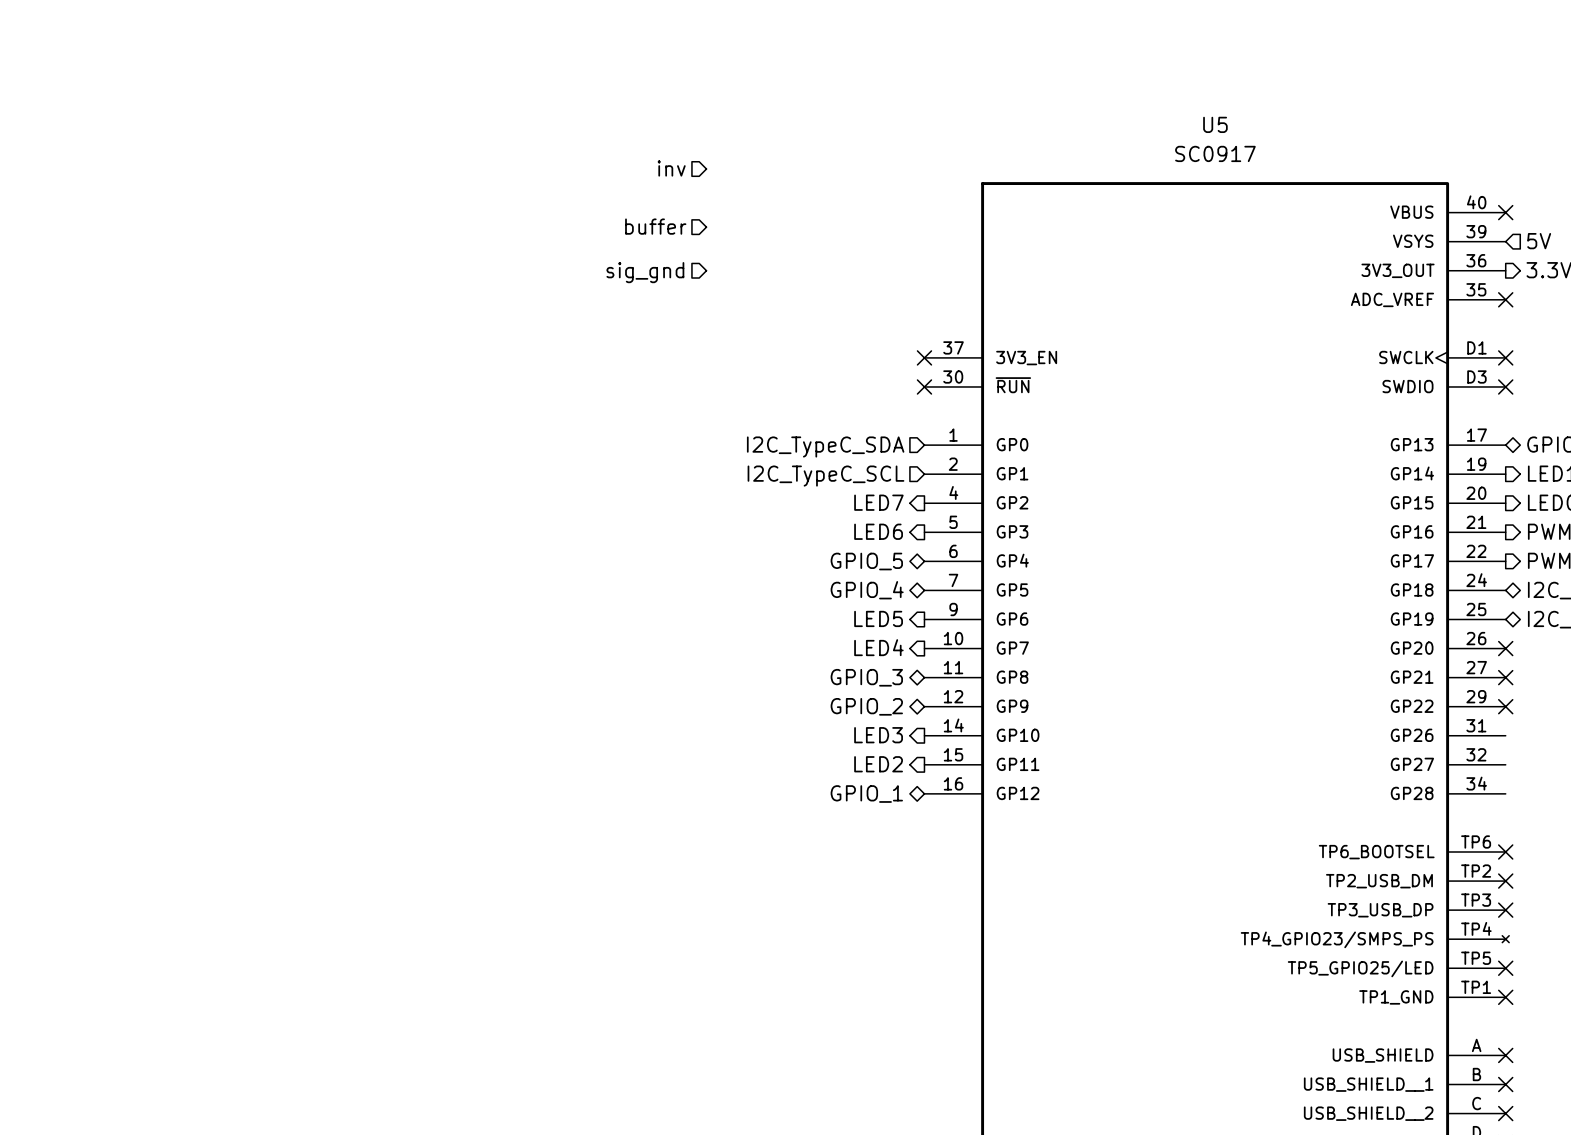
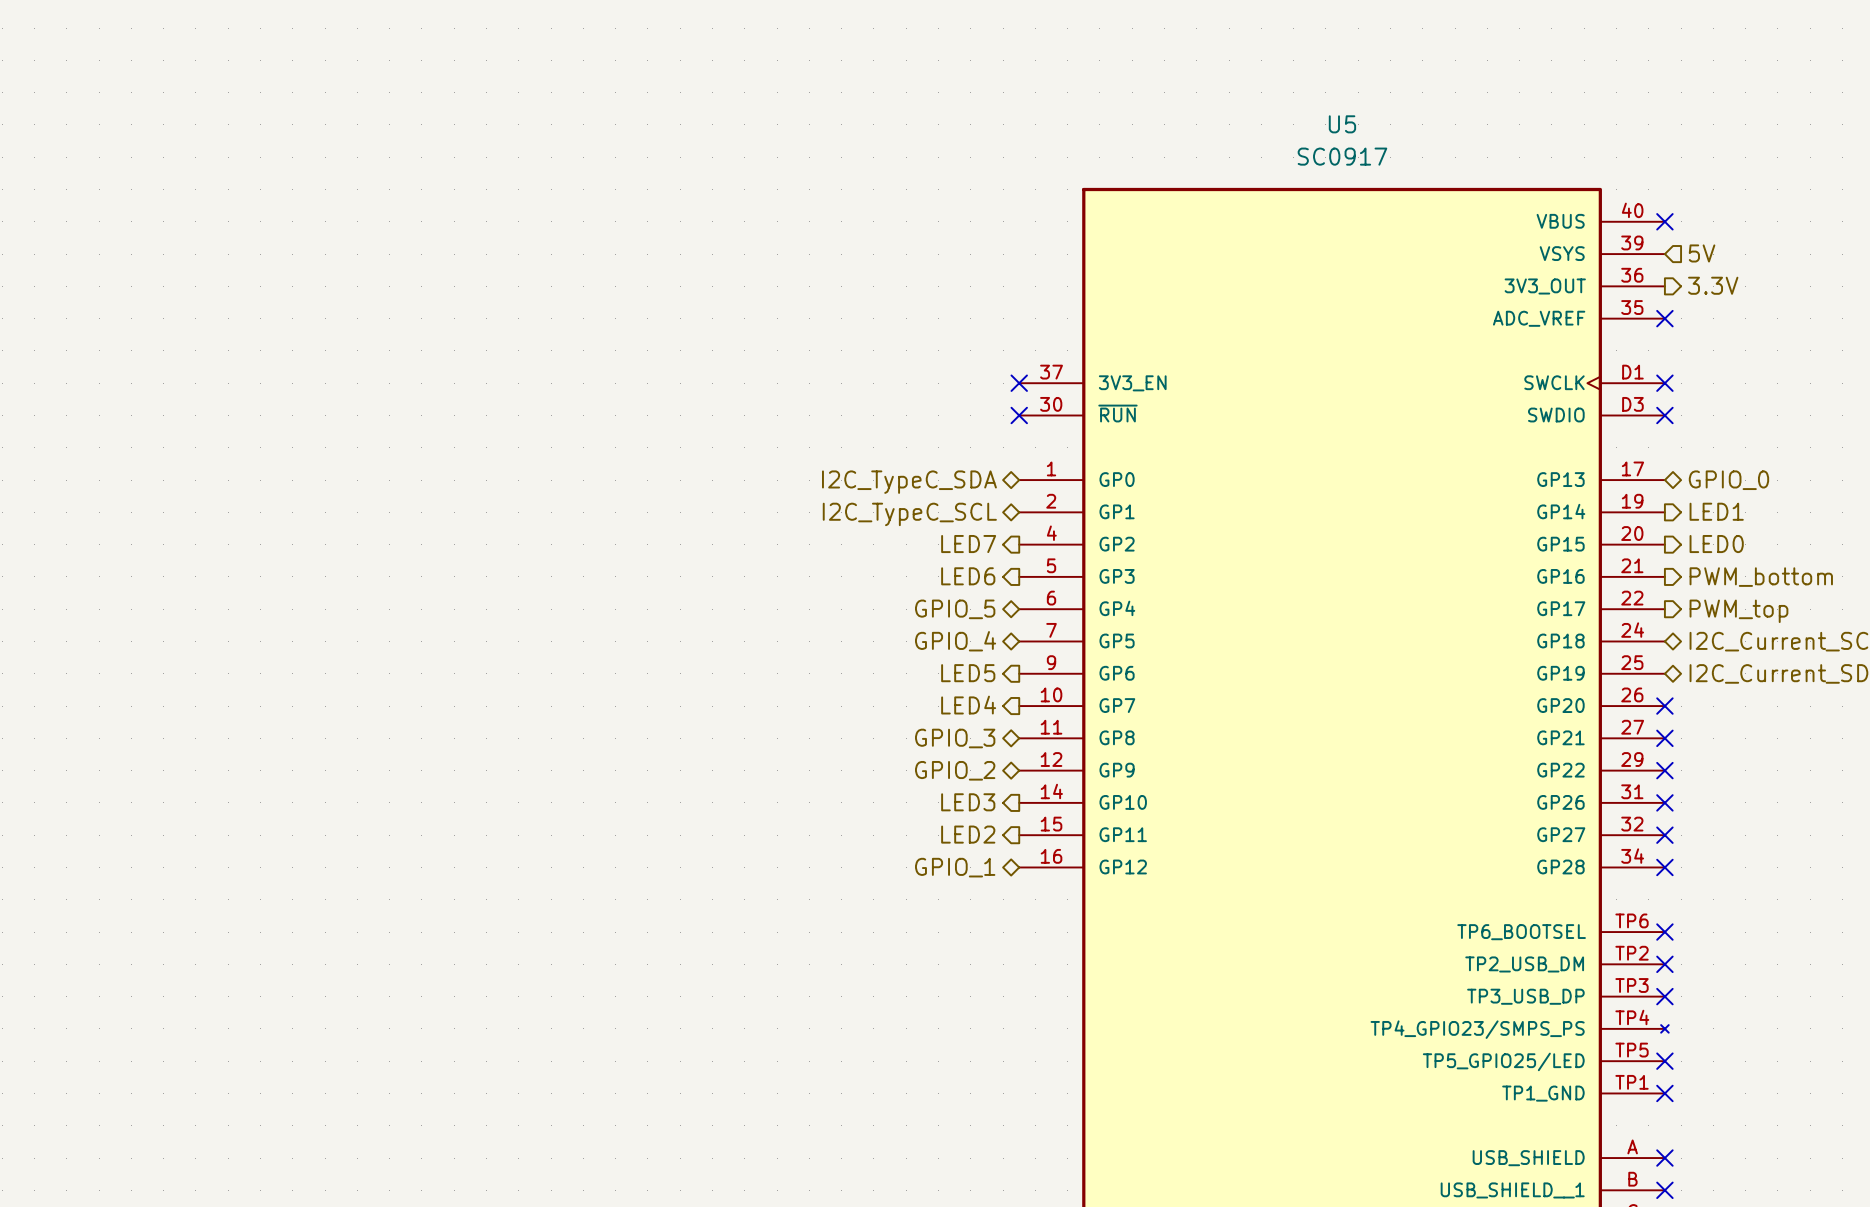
hierarchical label: inv (671, 168) -> none
hierarchical label: buffer (655, 226) -> none
hierarchical label: sig_gnd (645, 272) -> none
hierarchical label shape: input (825, 446) -> bidirectional (909, 482)
hierarchical label shape: input (825, 476) -> bidirectional (909, 514)
no-connect mark: none -> (1664, 802)
no-connect mark: none -> (1664, 835)
no-connect mark: none -> (1664, 867)

